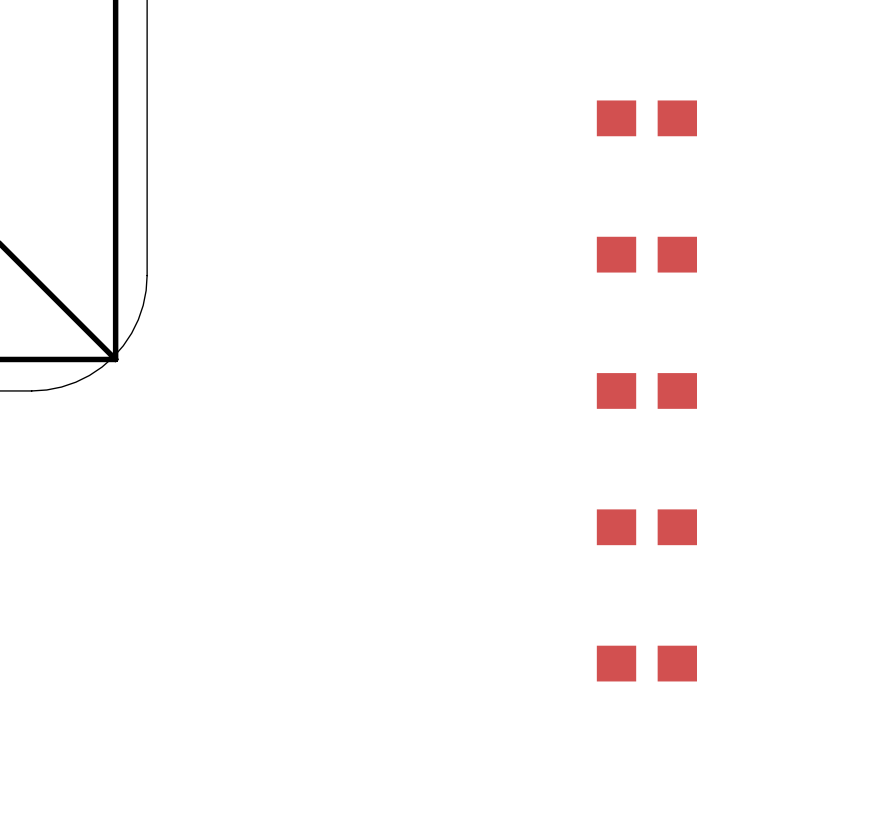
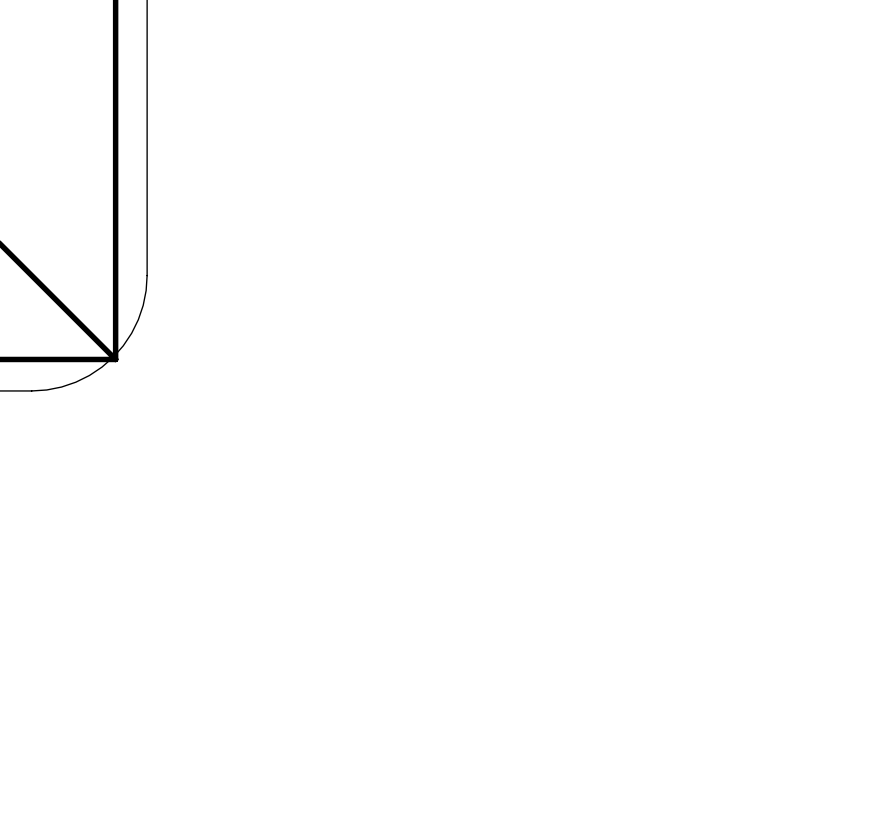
part: (646, 118) -> none
part: (646, 254) -> none
part: (646, 390) -> none
part: (646, 527) -> none
part: (646, 663) -> none

